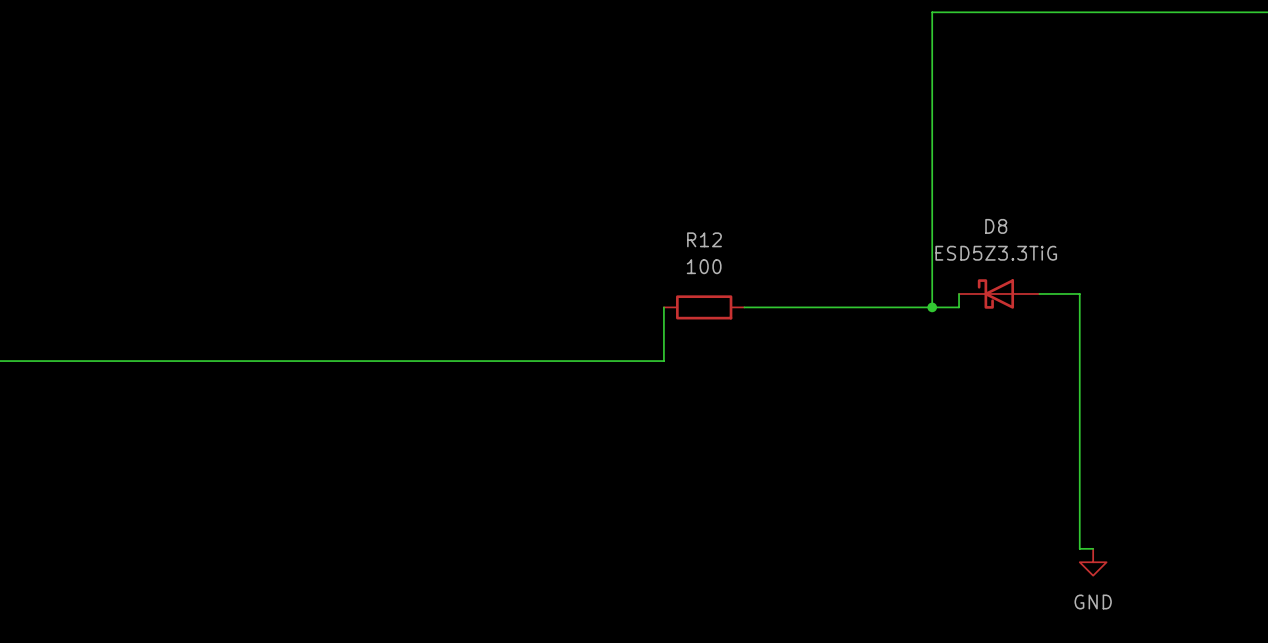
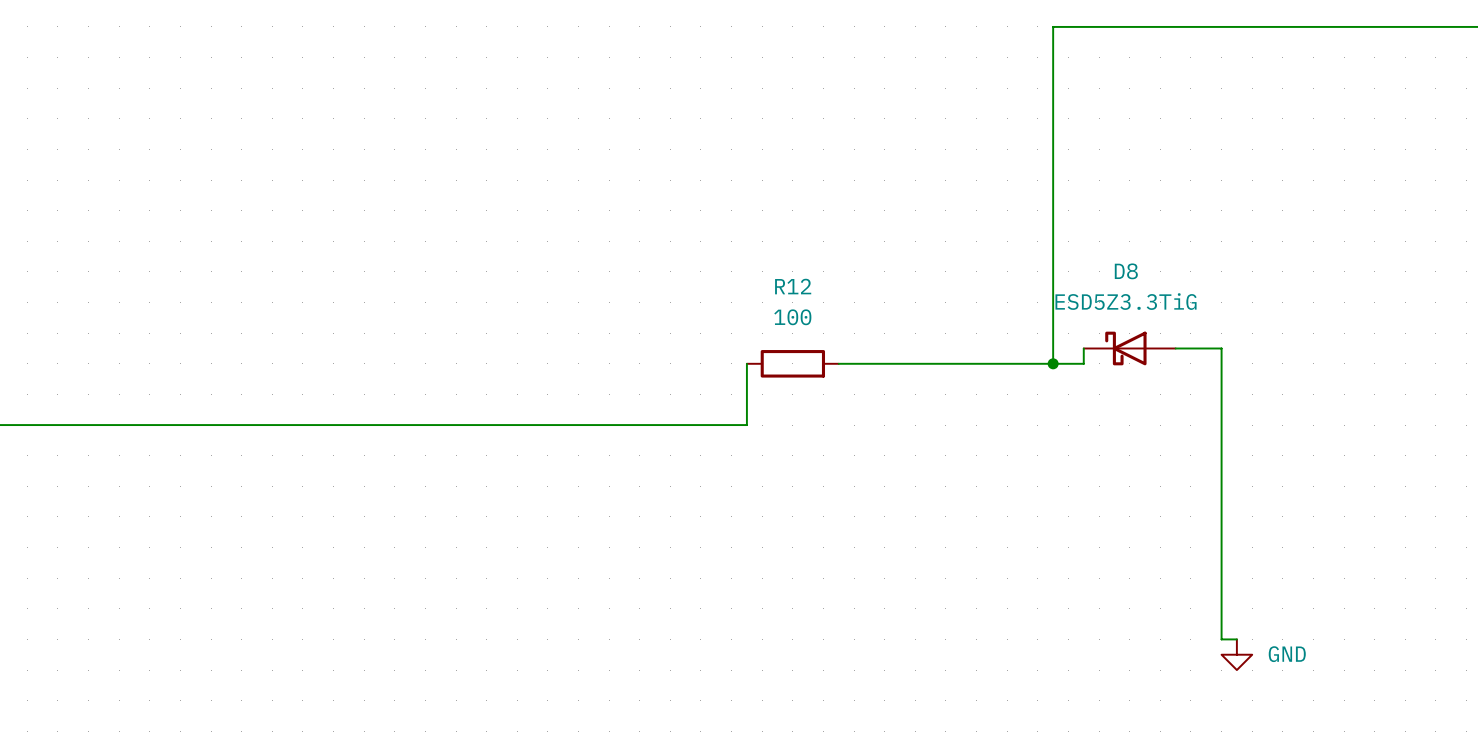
power symbol text position: GND (1093, 601) -> GND (1287, 654)

